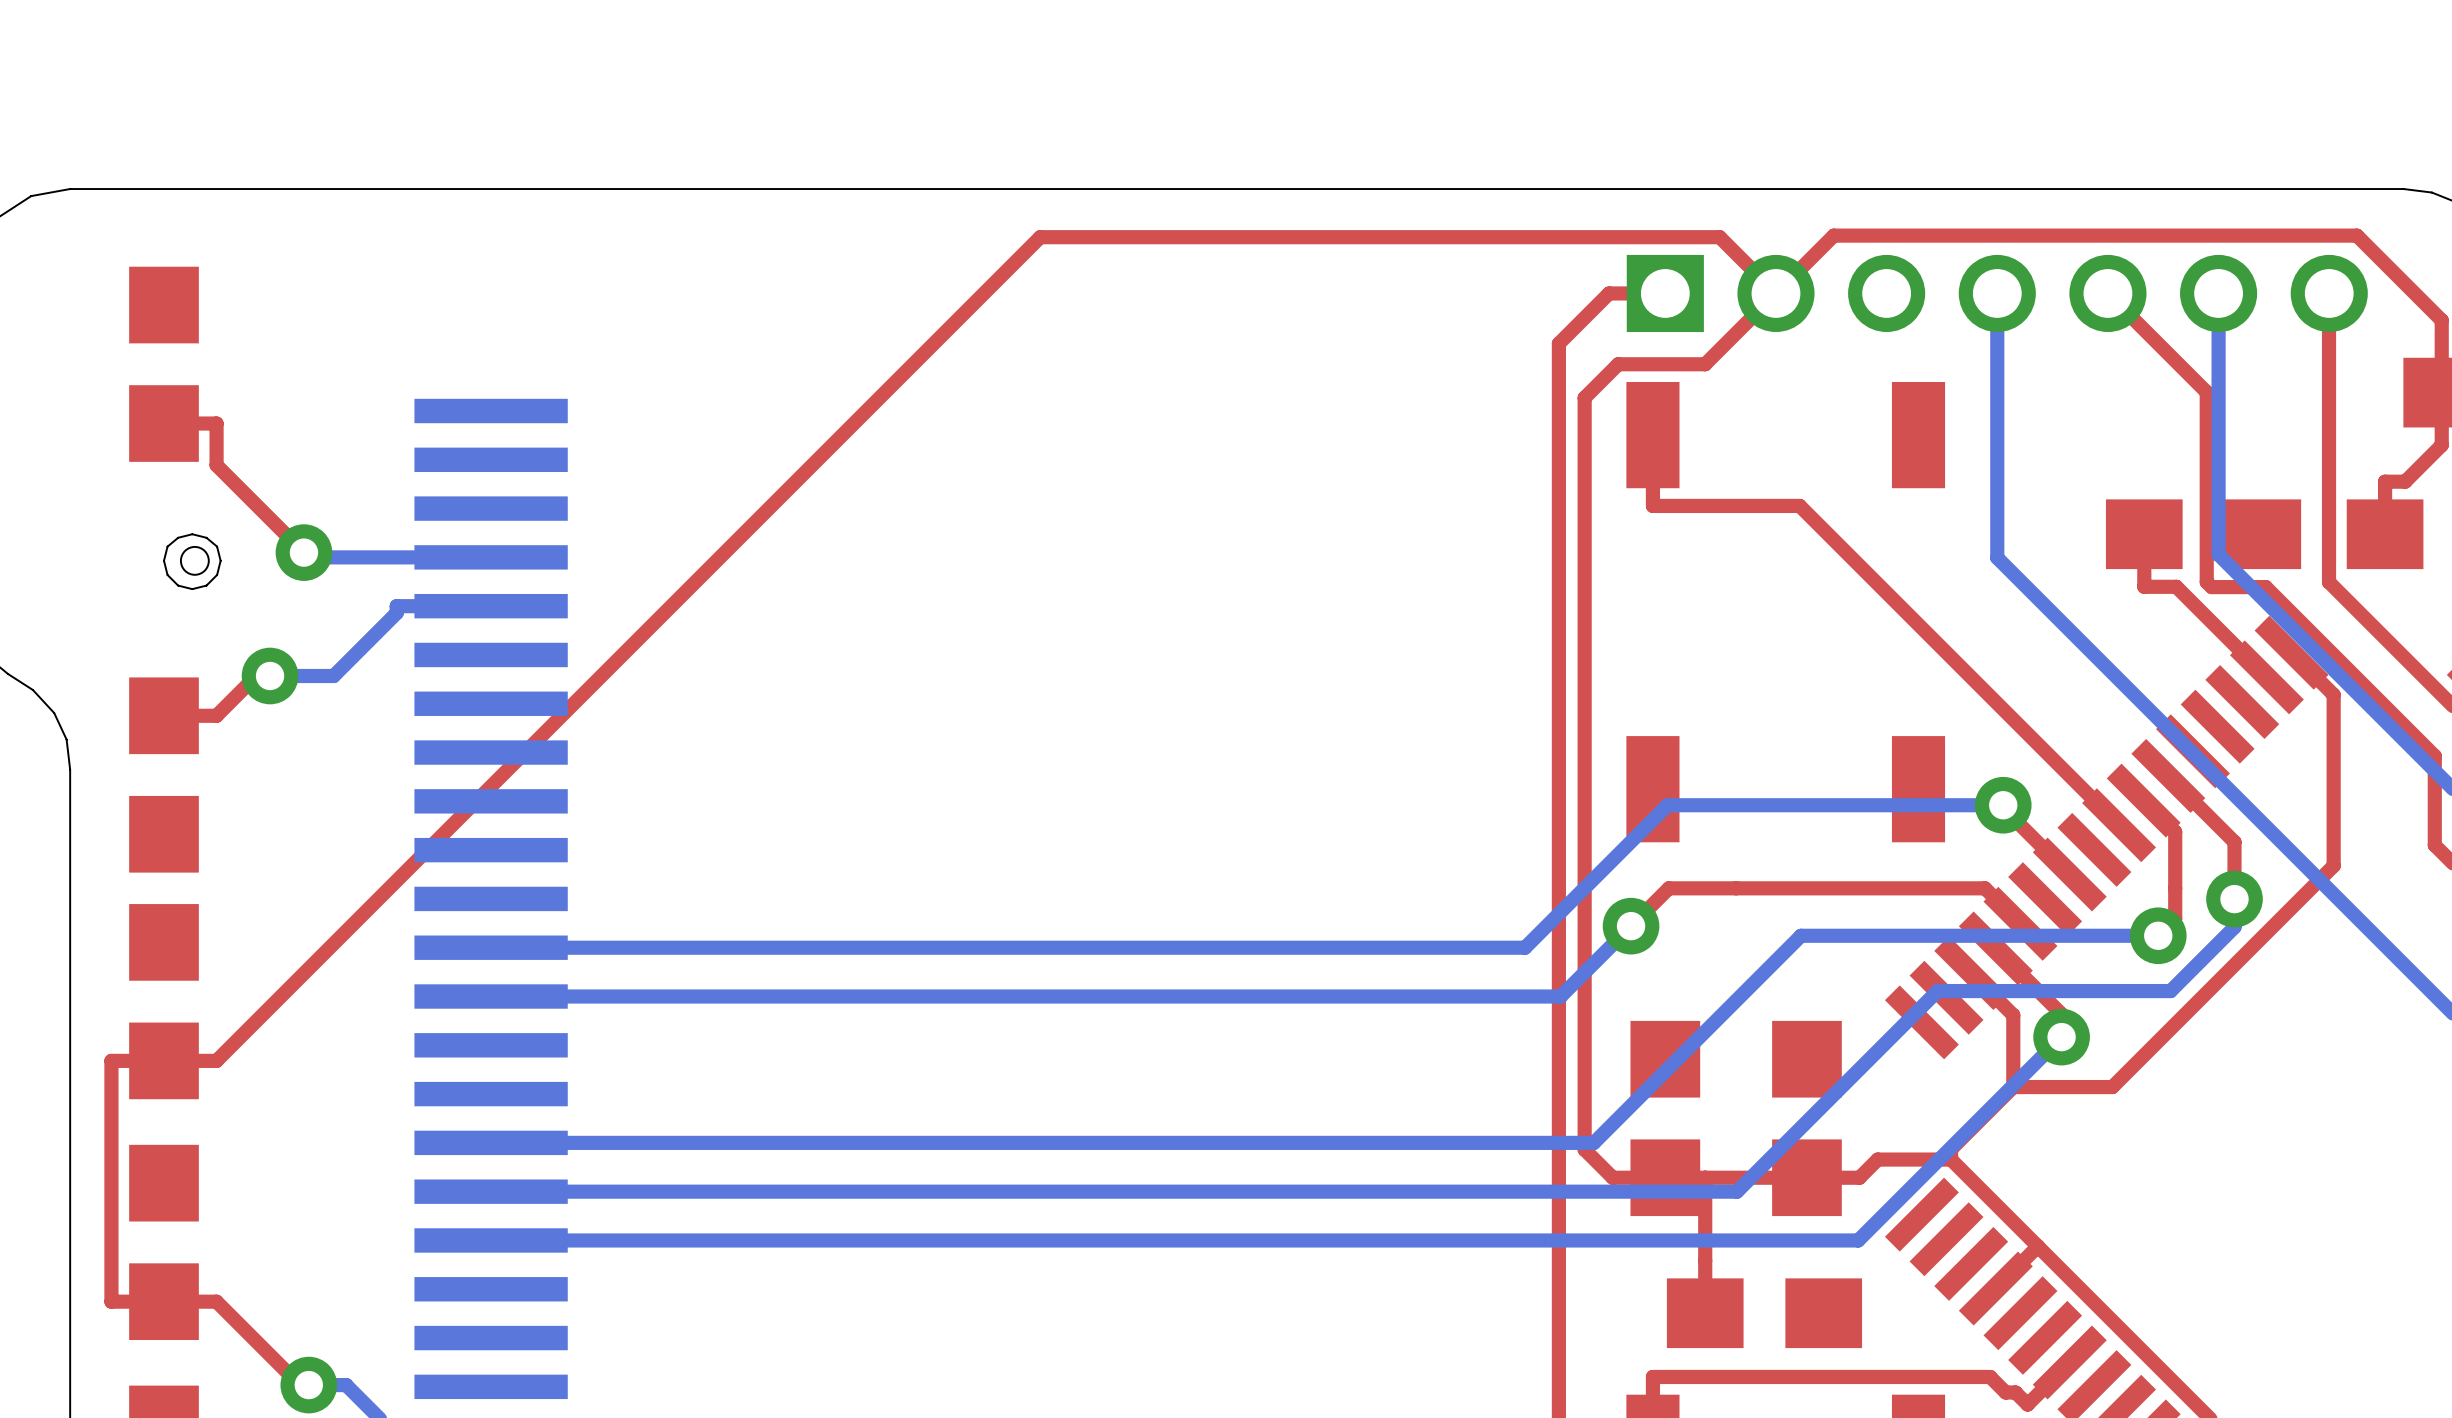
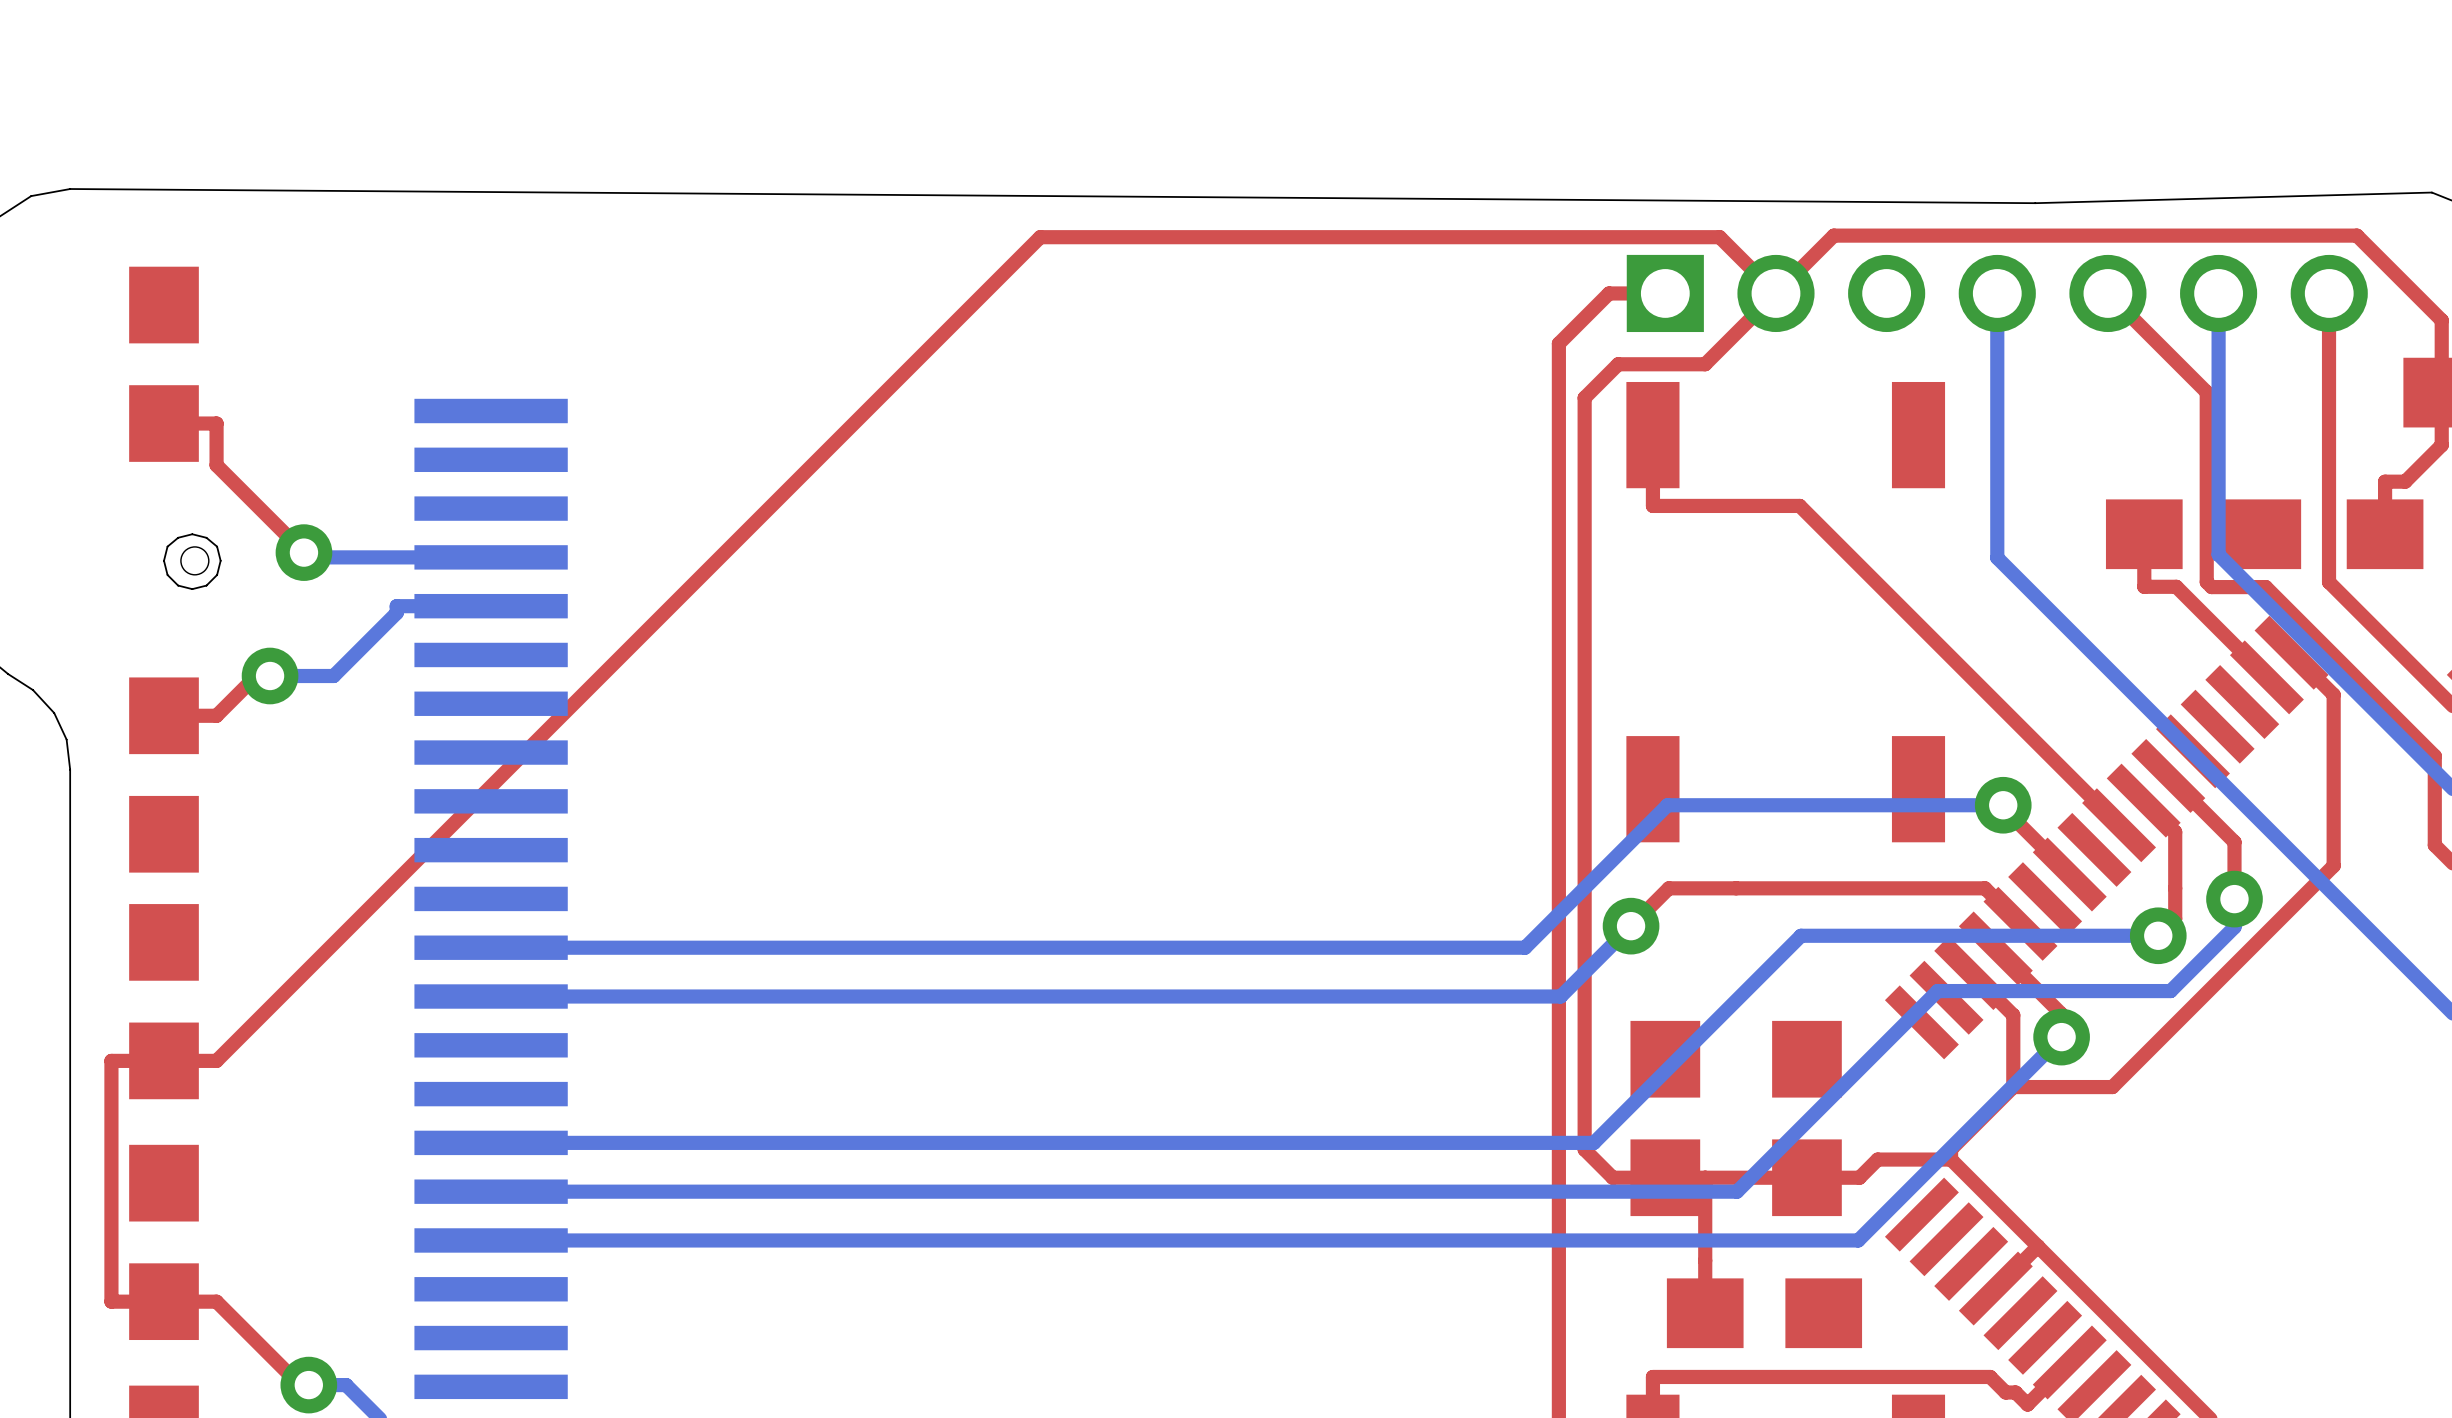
board edge: (70, 189) (2403, 189) (2431, 192) -> (70, 189) (2035, 203) (2431, 192)

